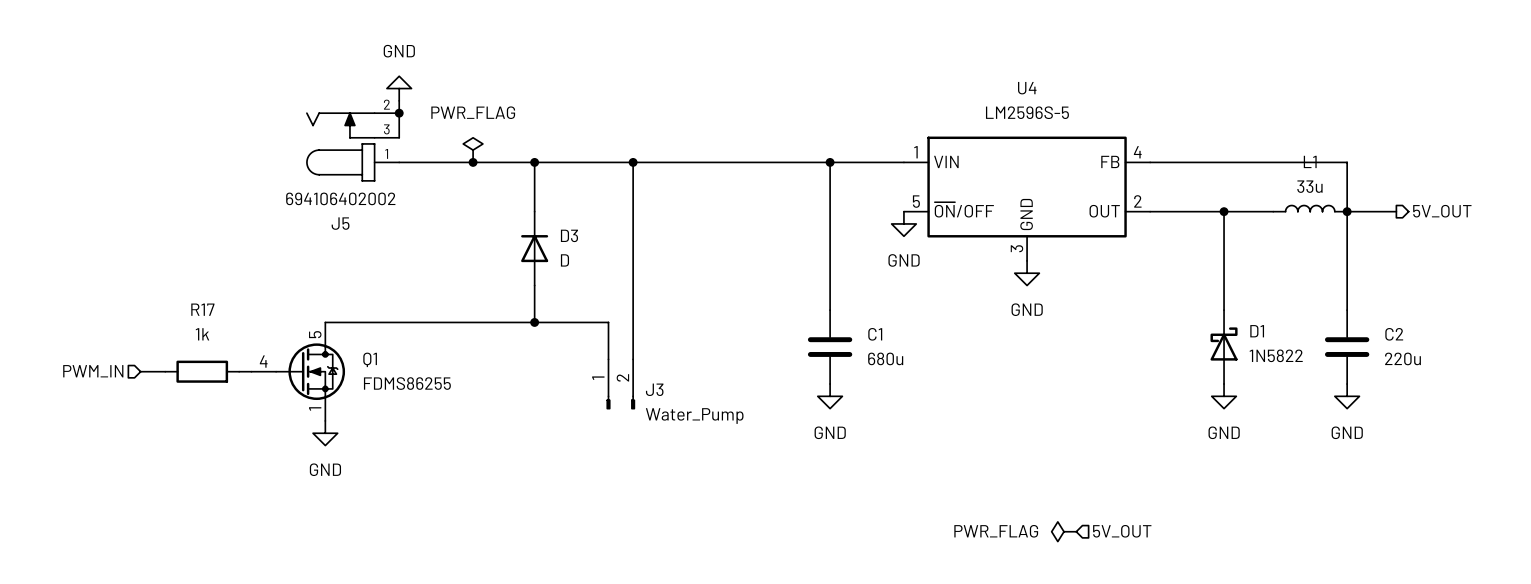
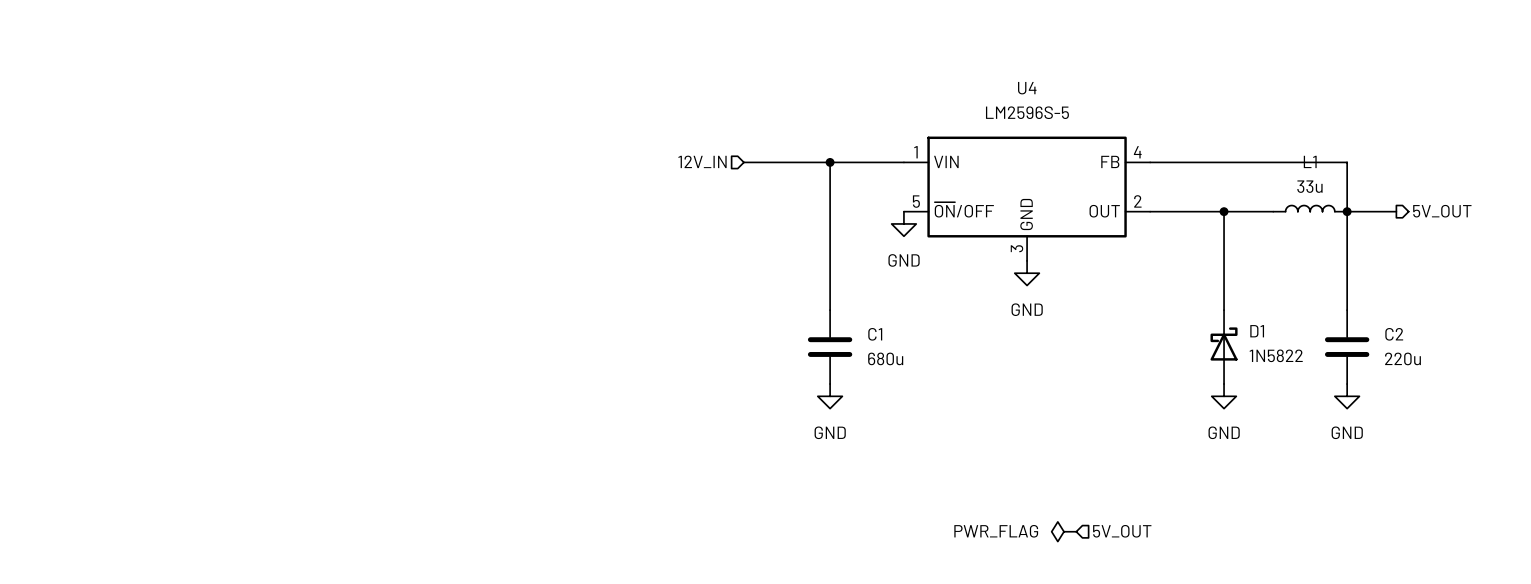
power symbol: GND (399, 88) -> none
wire: (399, 100) (399, 137) -> none
junction: (399, 113) -> none
J5: 694106402002 (352, 147) -> none
power symbol: PWR_FLAG (473, 150) -> none
hierarchical label: none -> 12V_IN (702, 161)
wire: (399, 162) (743, 162) -> none
junction: (473, 162) -> none
wire: (534, 162) (534, 211) -> none
junction: (534, 162) -> none
wire: (633, 162) (633, 359) -> none
junction: (633, 162) -> none
D3: D (534, 248) -> none
wire: (534, 285) (534, 322) -> none
wire: (325, 322) (608, 322) (608, 359) -> none
junction: (534, 322) -> none
hierarchical label: PWM_IN (93, 371) -> none
wire: (140, 371) (165, 371) -> none
R17: 1k (202, 371) -> none
wire: (239, 371) (251, 371) -> none
Q1: FDMS86255 (298, 371) -> none
J3: Water_Pump (620, 384) -> none
power symbol: GND (325, 433) -> none

